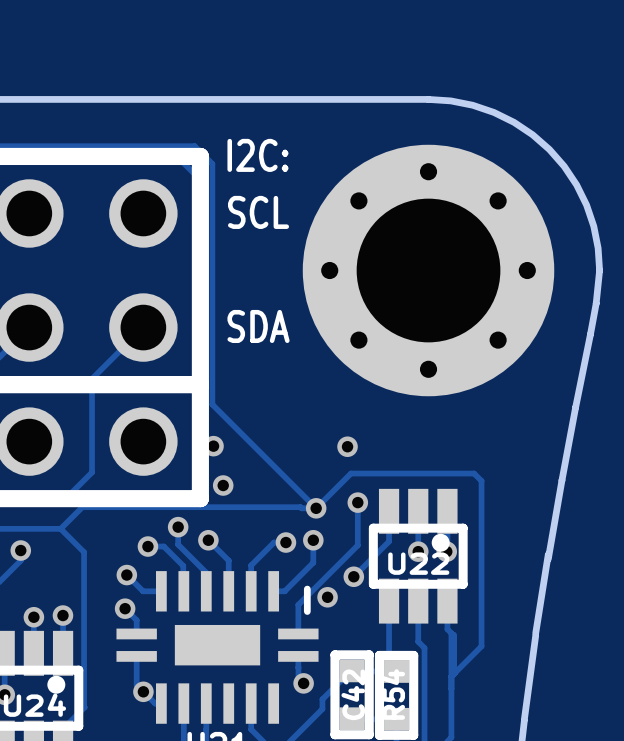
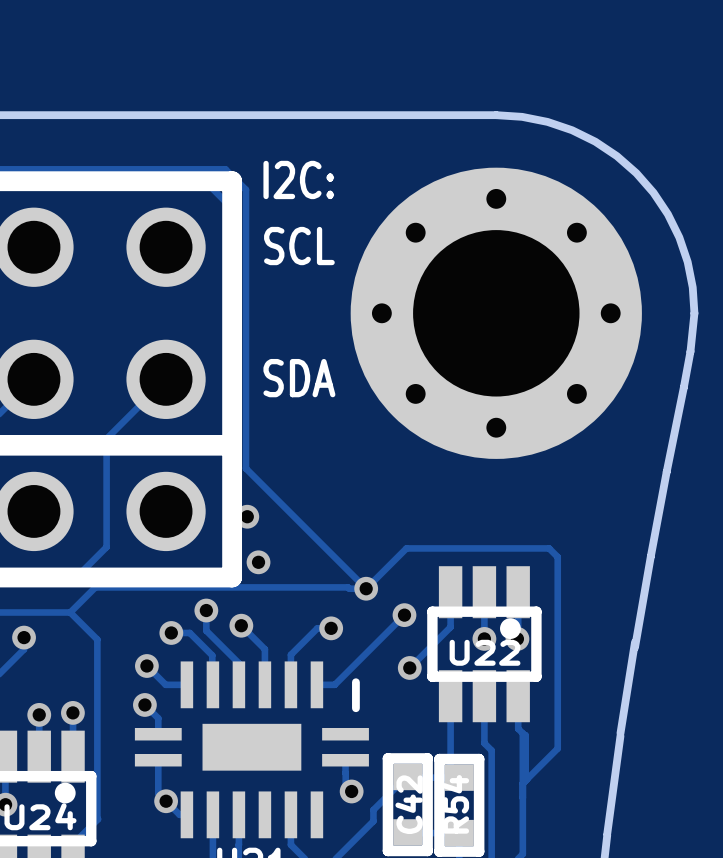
via: (347, 446) -> none
track: (357, 502) (357, 545) (298, 604) (298, 633) -> none
via: (357, 502) -> none
via: none -> (404, 615)
track: (313, 540) (313, 562) (284, 591) -> (404, 615) (334, 684) (329, 684)
via: (313, 540) -> none
via: (327, 597) -> none

